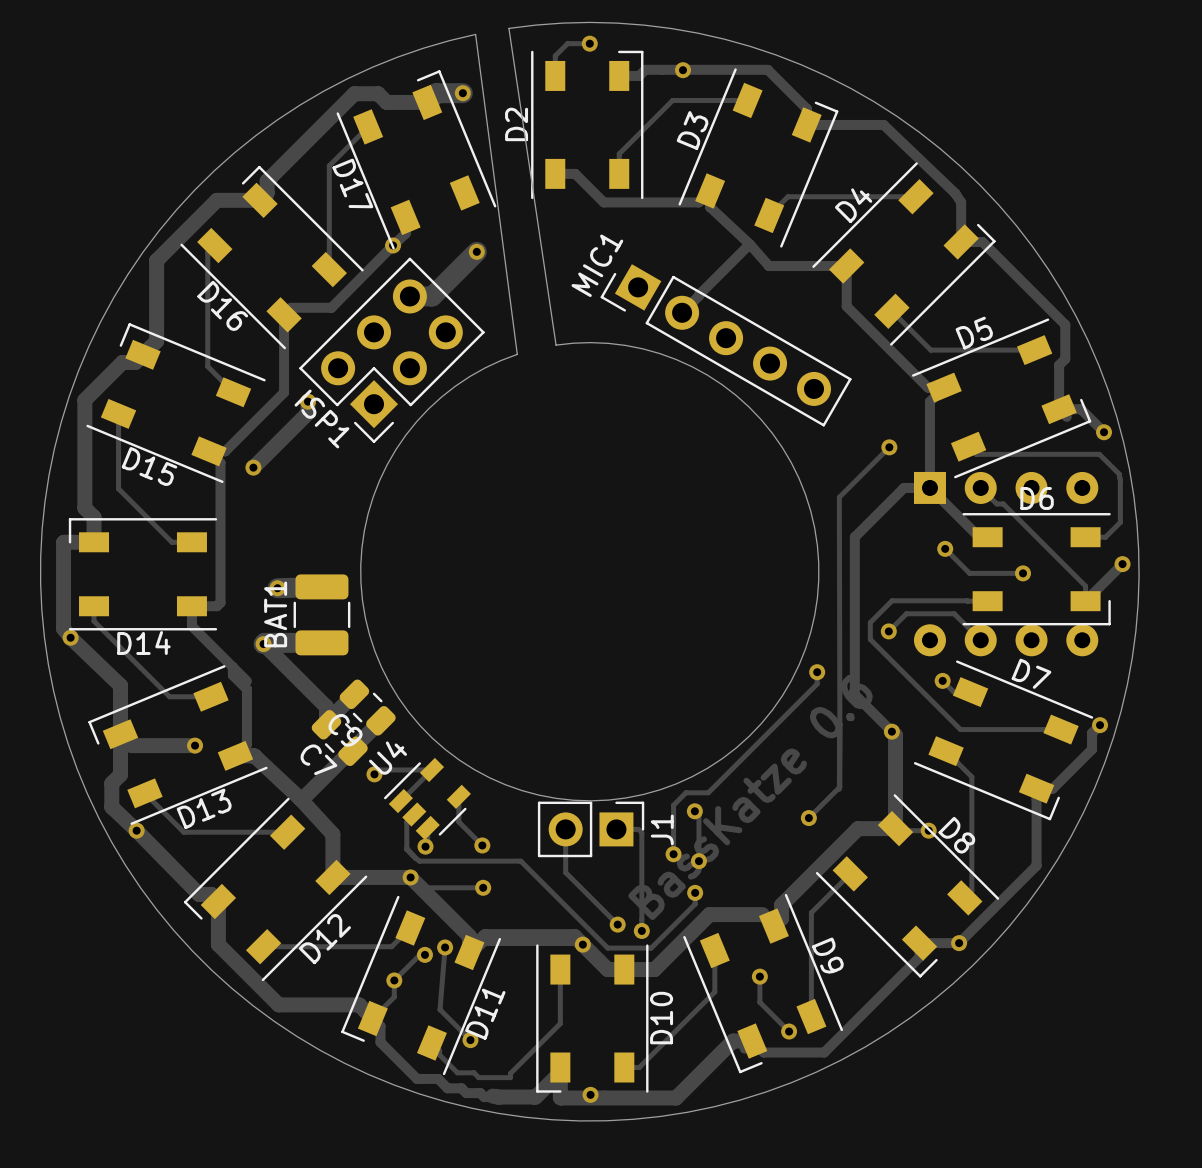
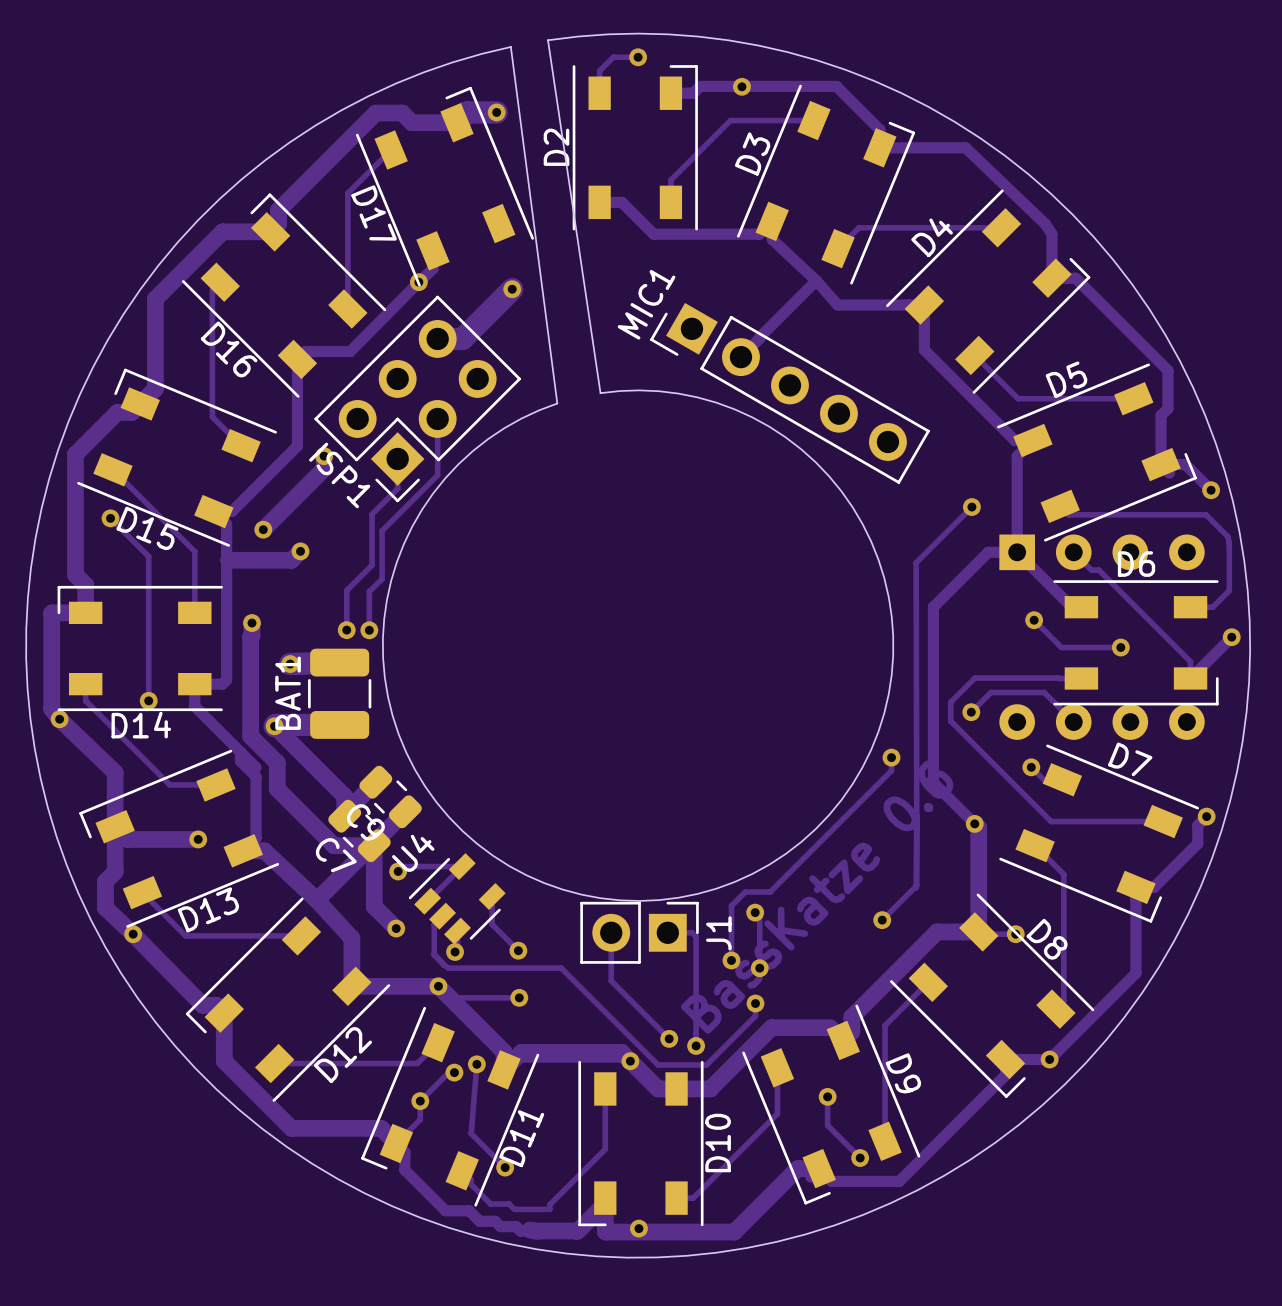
track: none -> (437, 418) (437, 475) (382, 530) (382, 579) (369, 591) (369, 630)
track: none -> (397, 458) (397, 488) (372, 514) (372, 565) (346, 590) (346, 630)
track: (118, 413) (118, 488) (171, 542) (191, 542) -> (113, 469) (194, 551) (194, 612)
track: none -> (110, 518) (148, 556) (148, 700)
via: none -> (110, 518)
track: none -> (300, 551) (291, 560) (228, 560)
via: none -> (300, 551)
track: none -> (251, 623) (250, 736) (277, 762) (277, 788) (334, 845) (374, 845) (374, 906) (396, 928)
via: none -> (251, 623)
via: none -> (346, 630)
via: none -> (369, 630)
via: none -> (148, 700)
via: none -> (396, 928)

